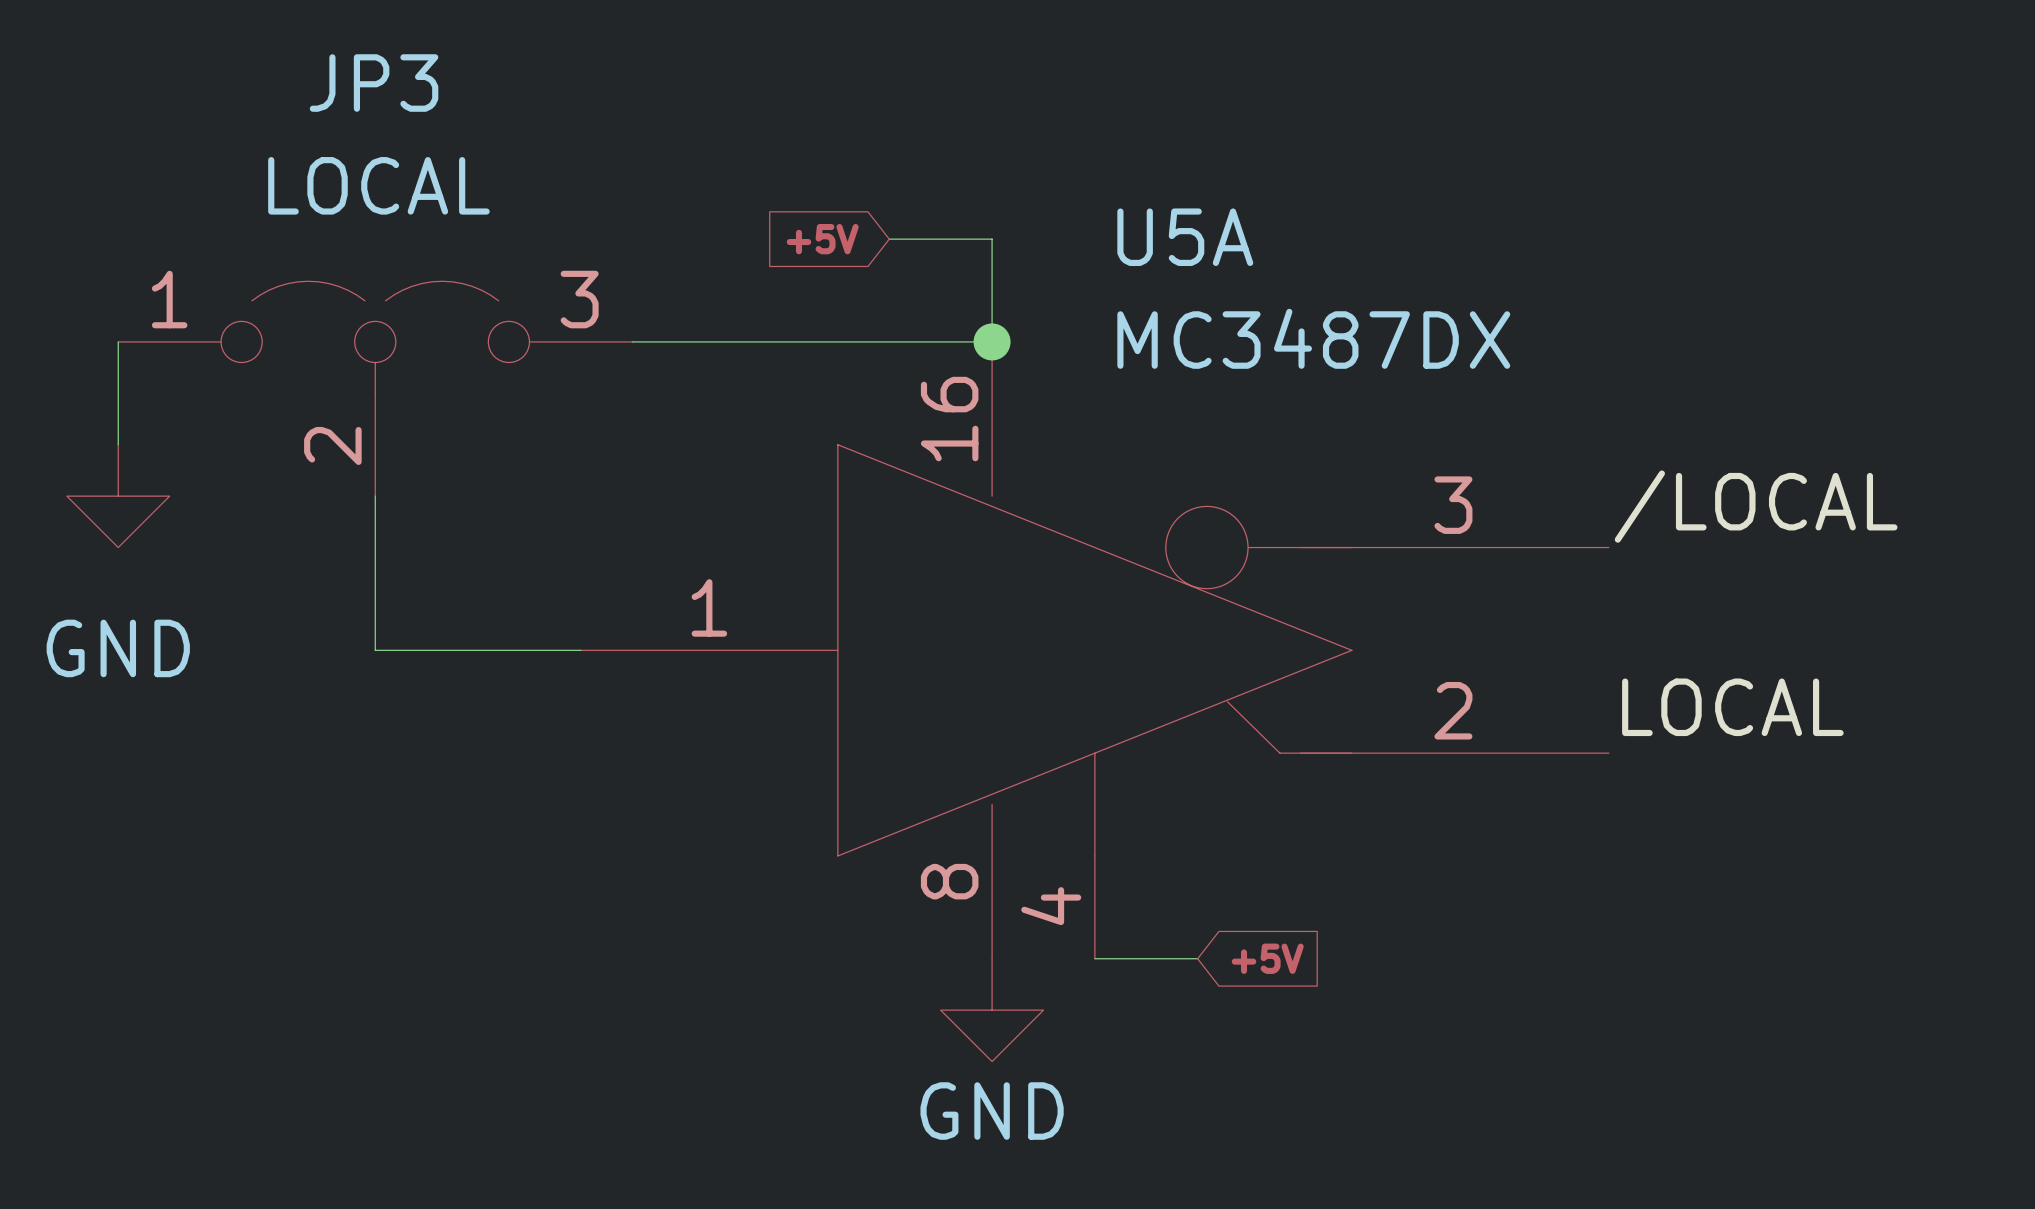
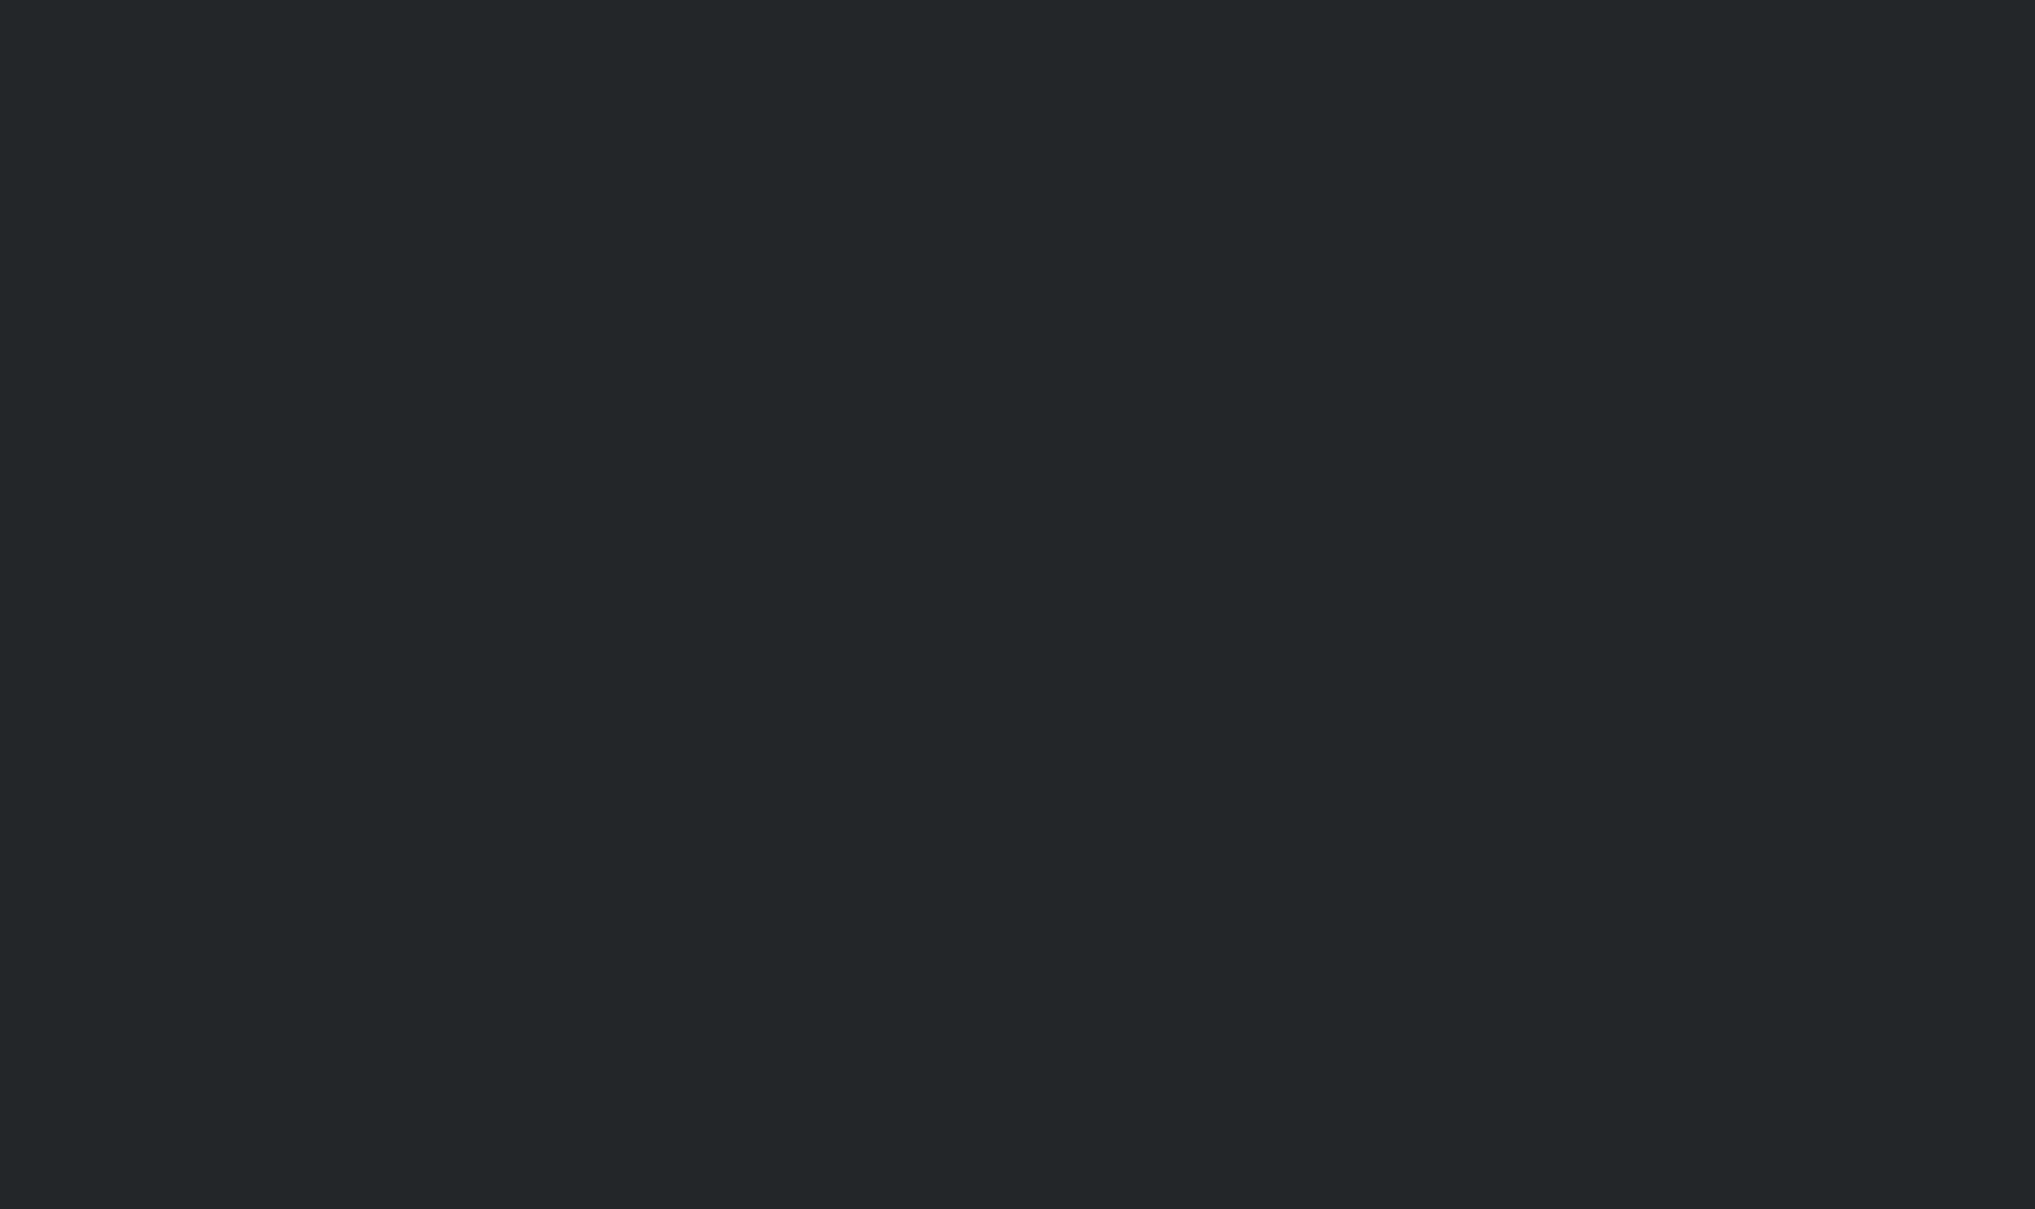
global label: +5V (822, 239) -> none
wire: (889, 239) (992, 239) (992, 341) (632, 341) -> none
wire: (118, 341) (118, 444) -> none
junction: (992, 341) -> none
JP3: LOCAL (375, 388) -> none
power symbol: GND (118, 496) -> none
wire: (375, 496) (375, 650) (580, 650) -> none
label: /LOCAL (1756, 506) -> none
U5A: MC3487DX (1094, 650) -> none
label: LOCAL (1732, 707) -> none
wire: (1094, 958) (1197, 958) -> none
global label: +5V (1267, 958) -> none
power symbol: GND (992, 1010) -> none

